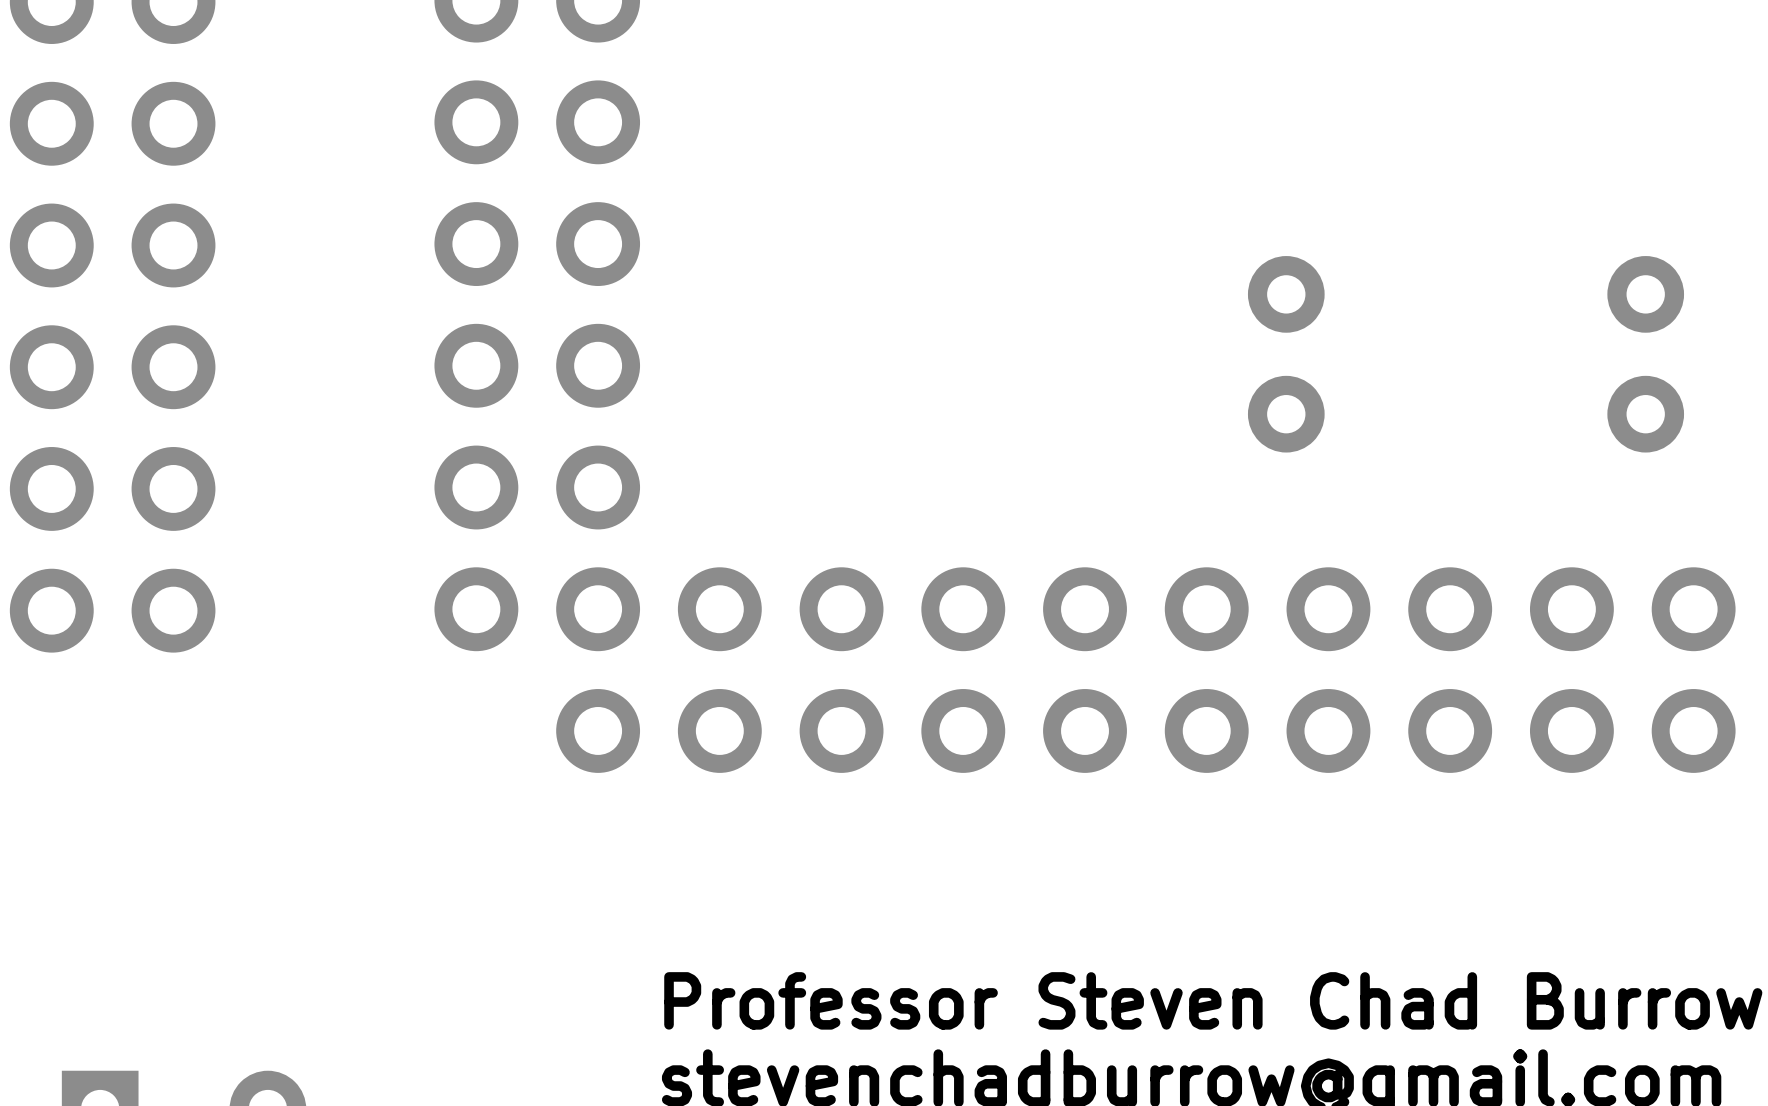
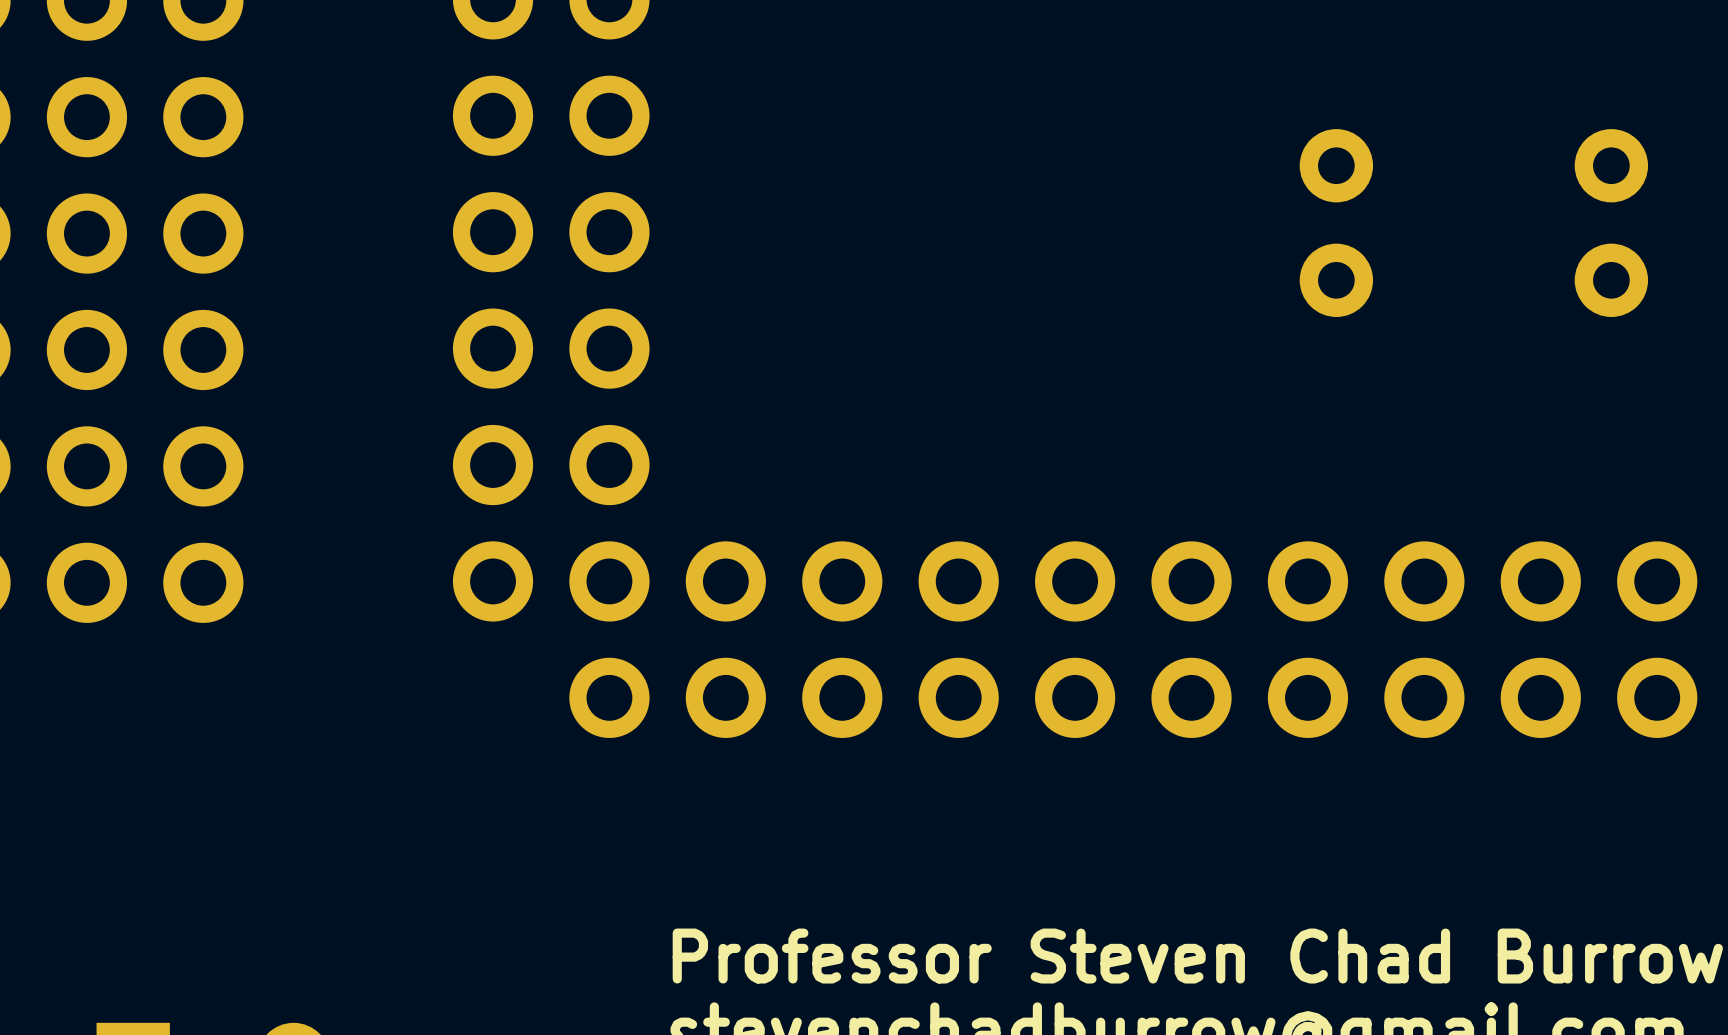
part position: (1286, 354) -> (1336, 223)
part position: (1645, 354) -> (1611, 223)

